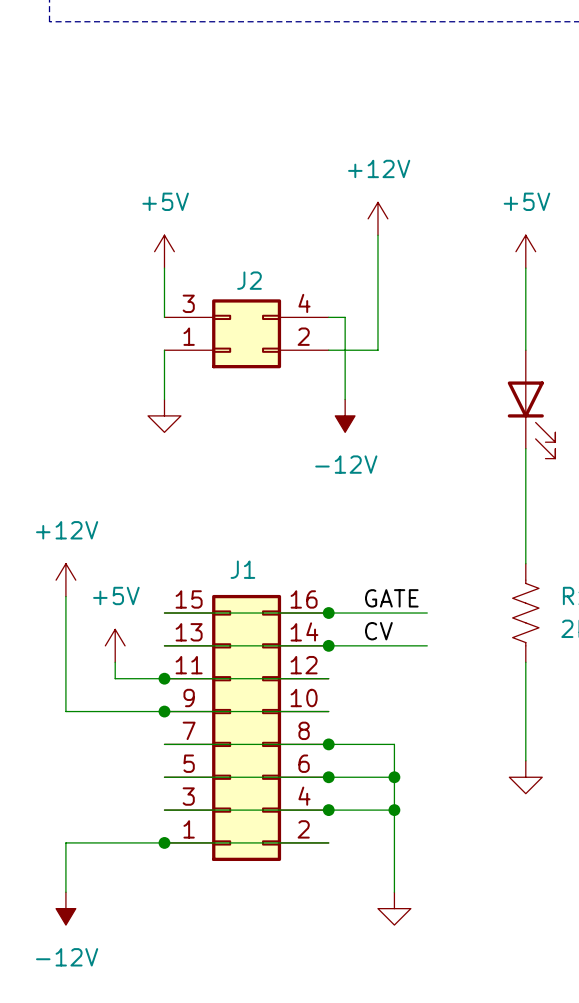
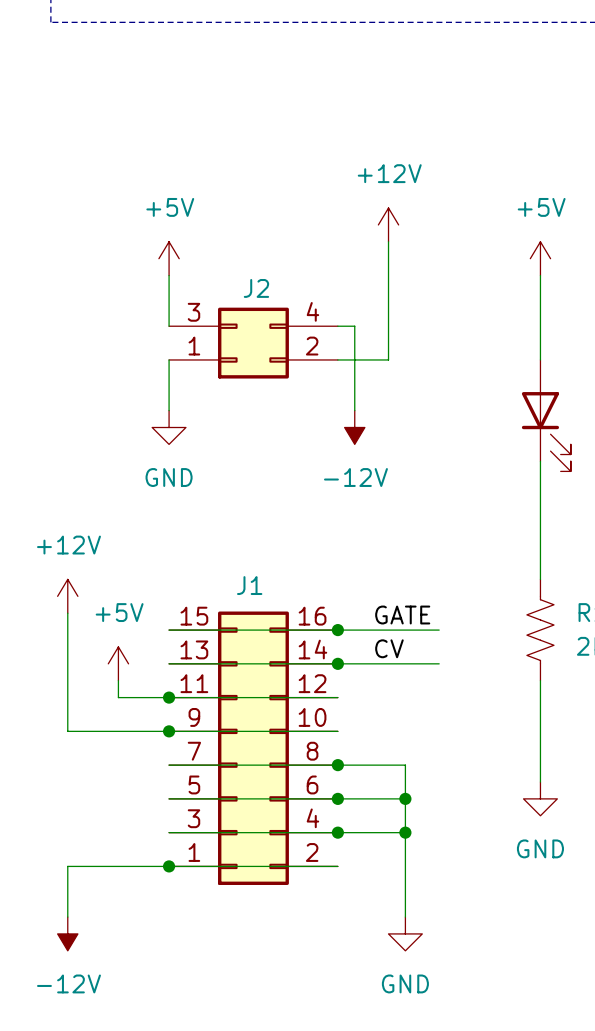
power symbol text: none -> GND (169, 477)
power symbol text: none -> GND (540, 848)
power symbol text: none -> GND (405, 983)

